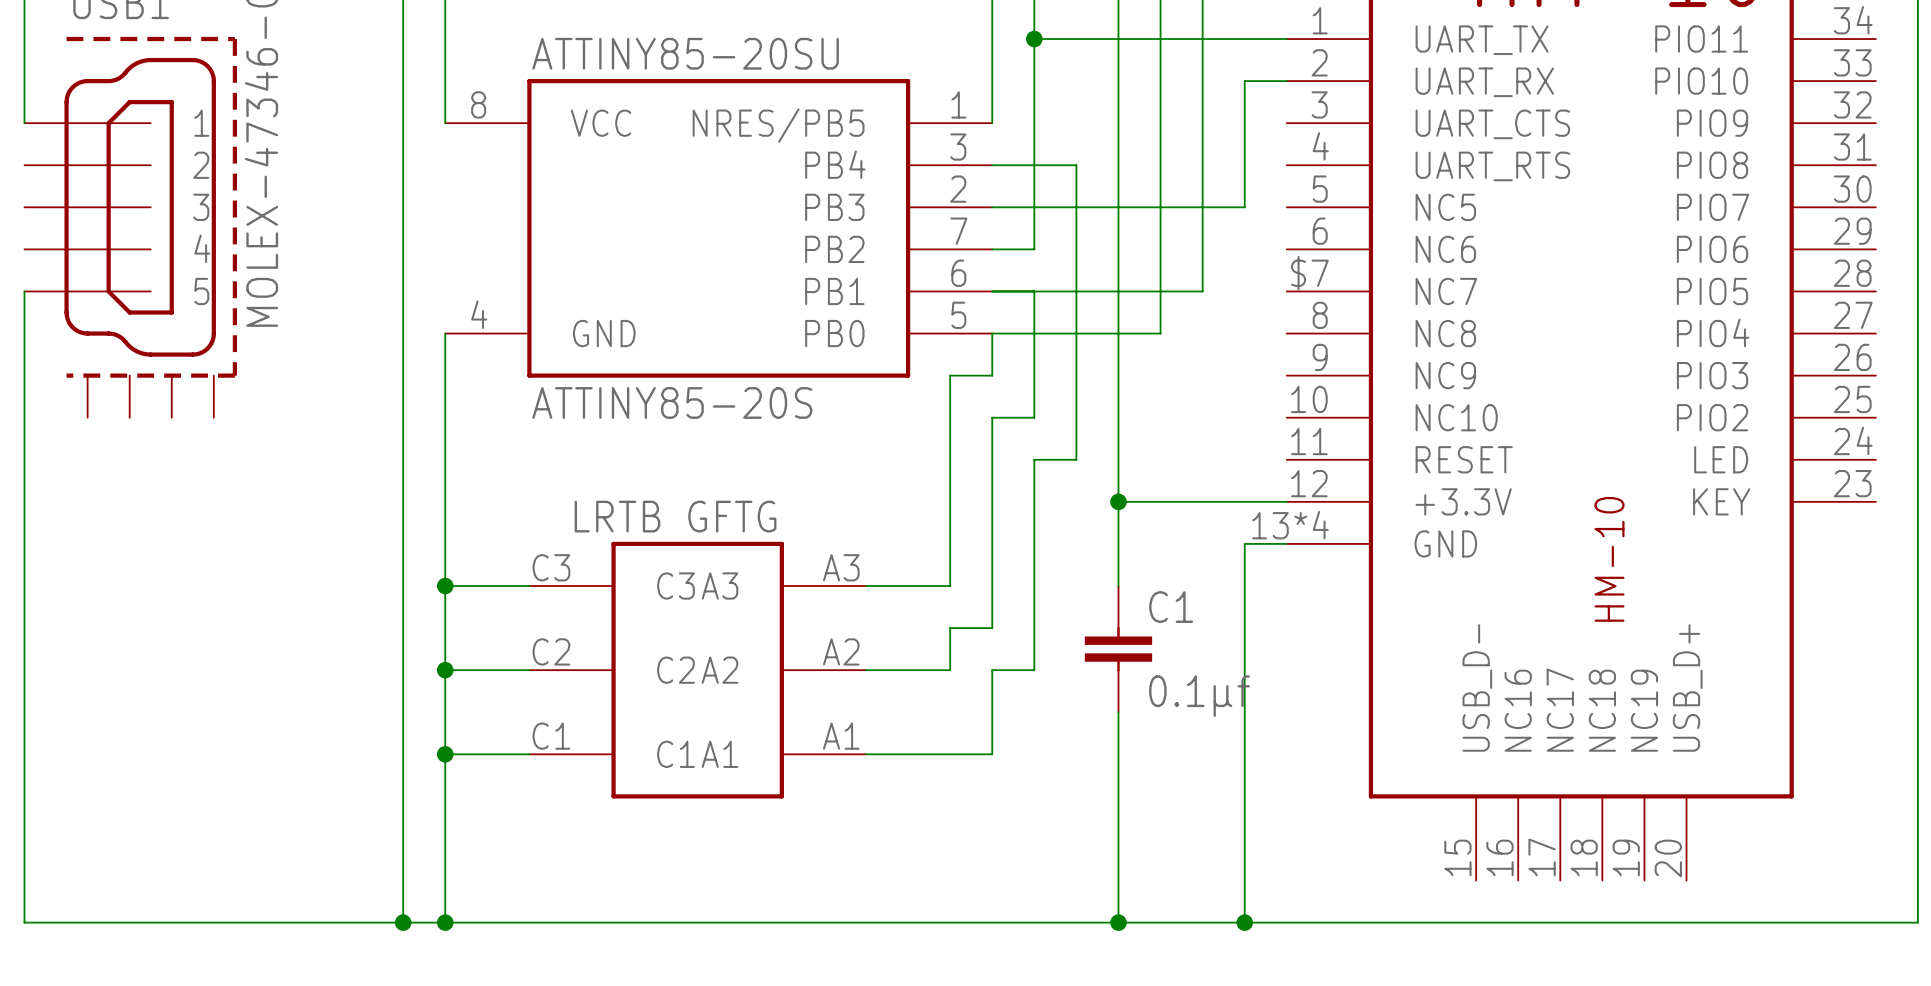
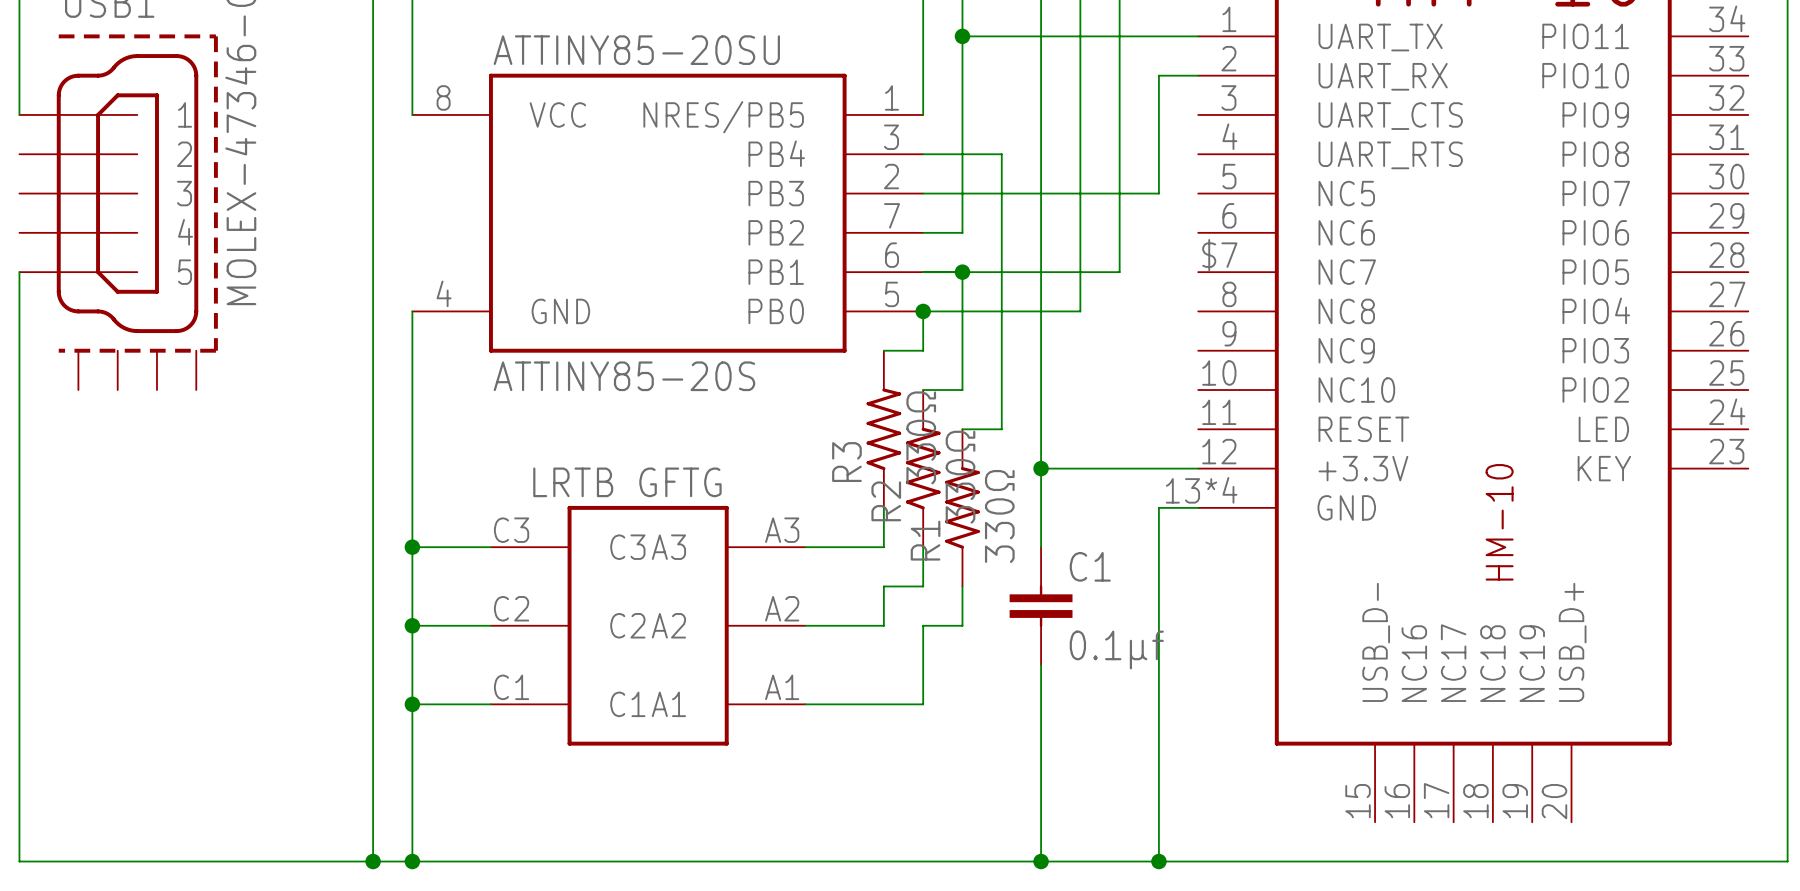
junction: none -> (962, 272)
junction: none -> (923, 311)
R3: none -> 330Ω (883, 429)
R2: none -> 330Ω (923, 468)
R1: none -> 330Ω (962, 507)

